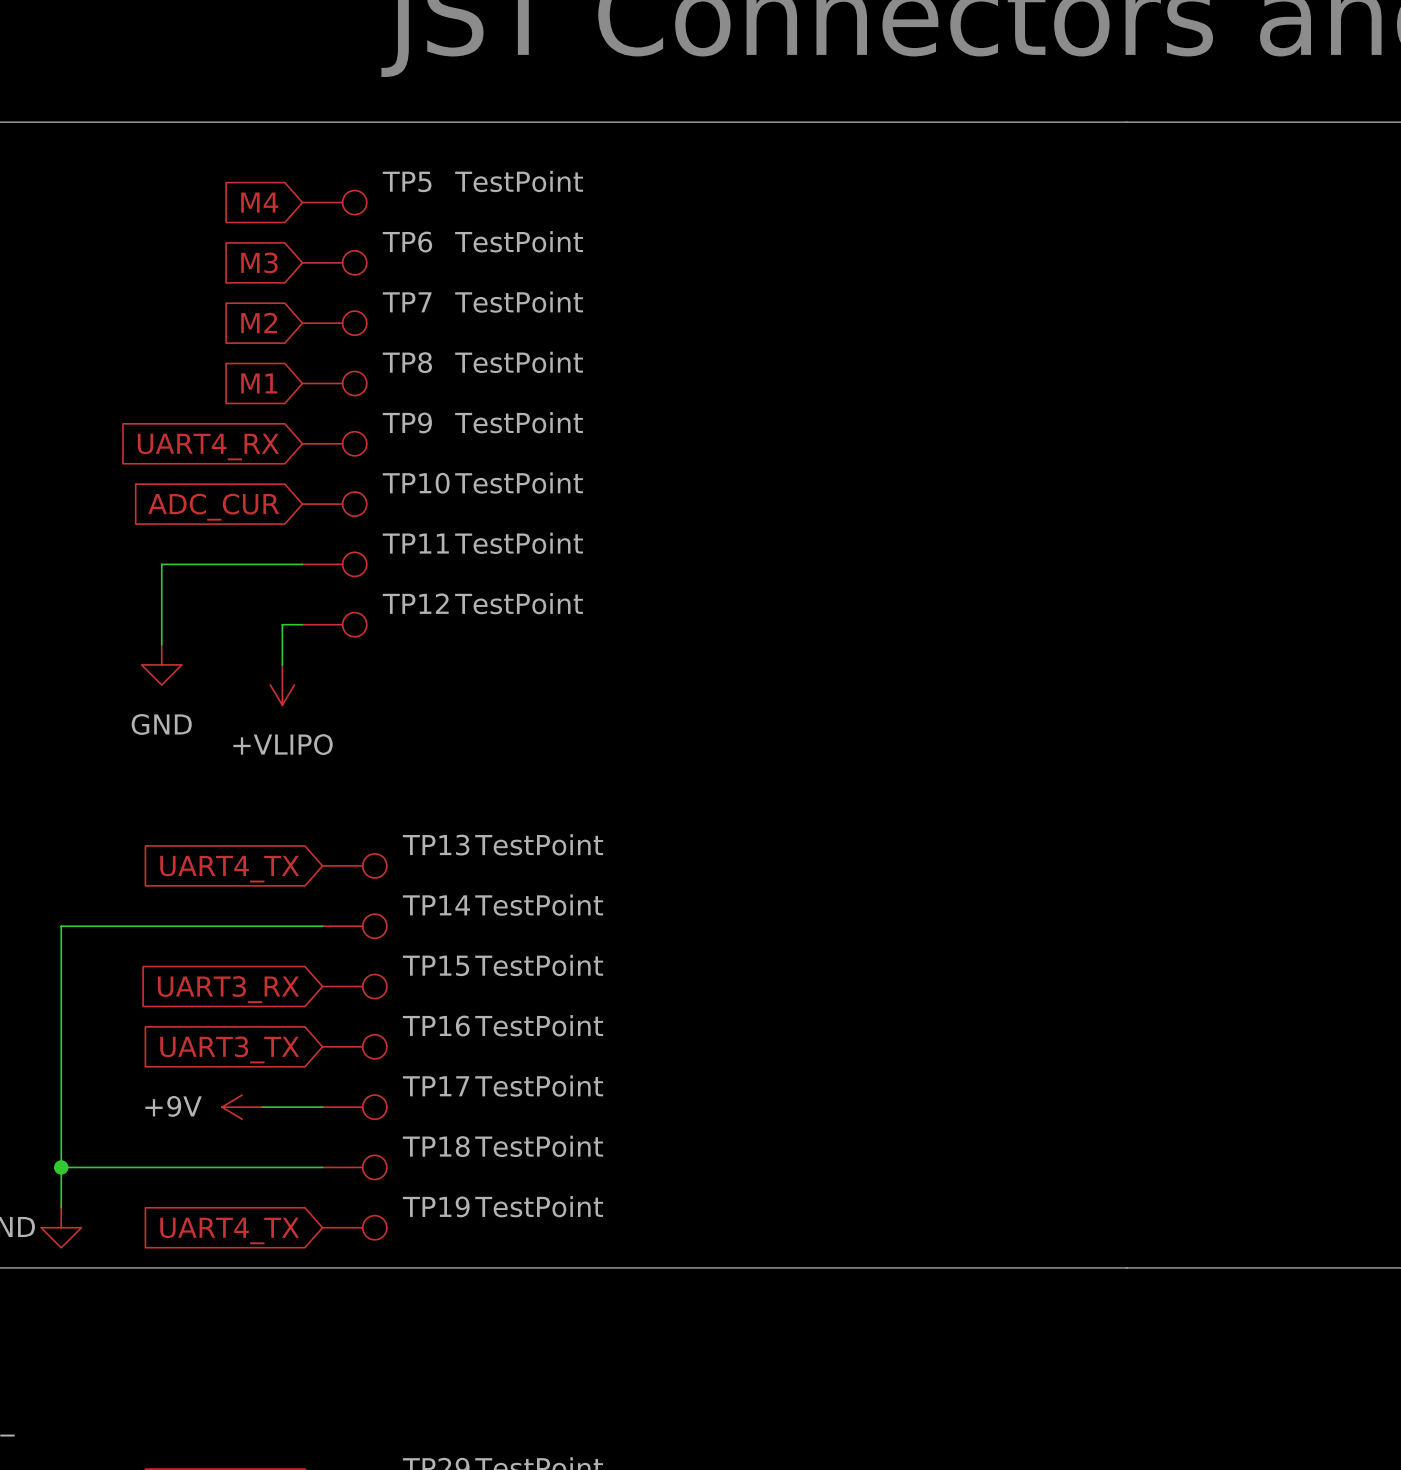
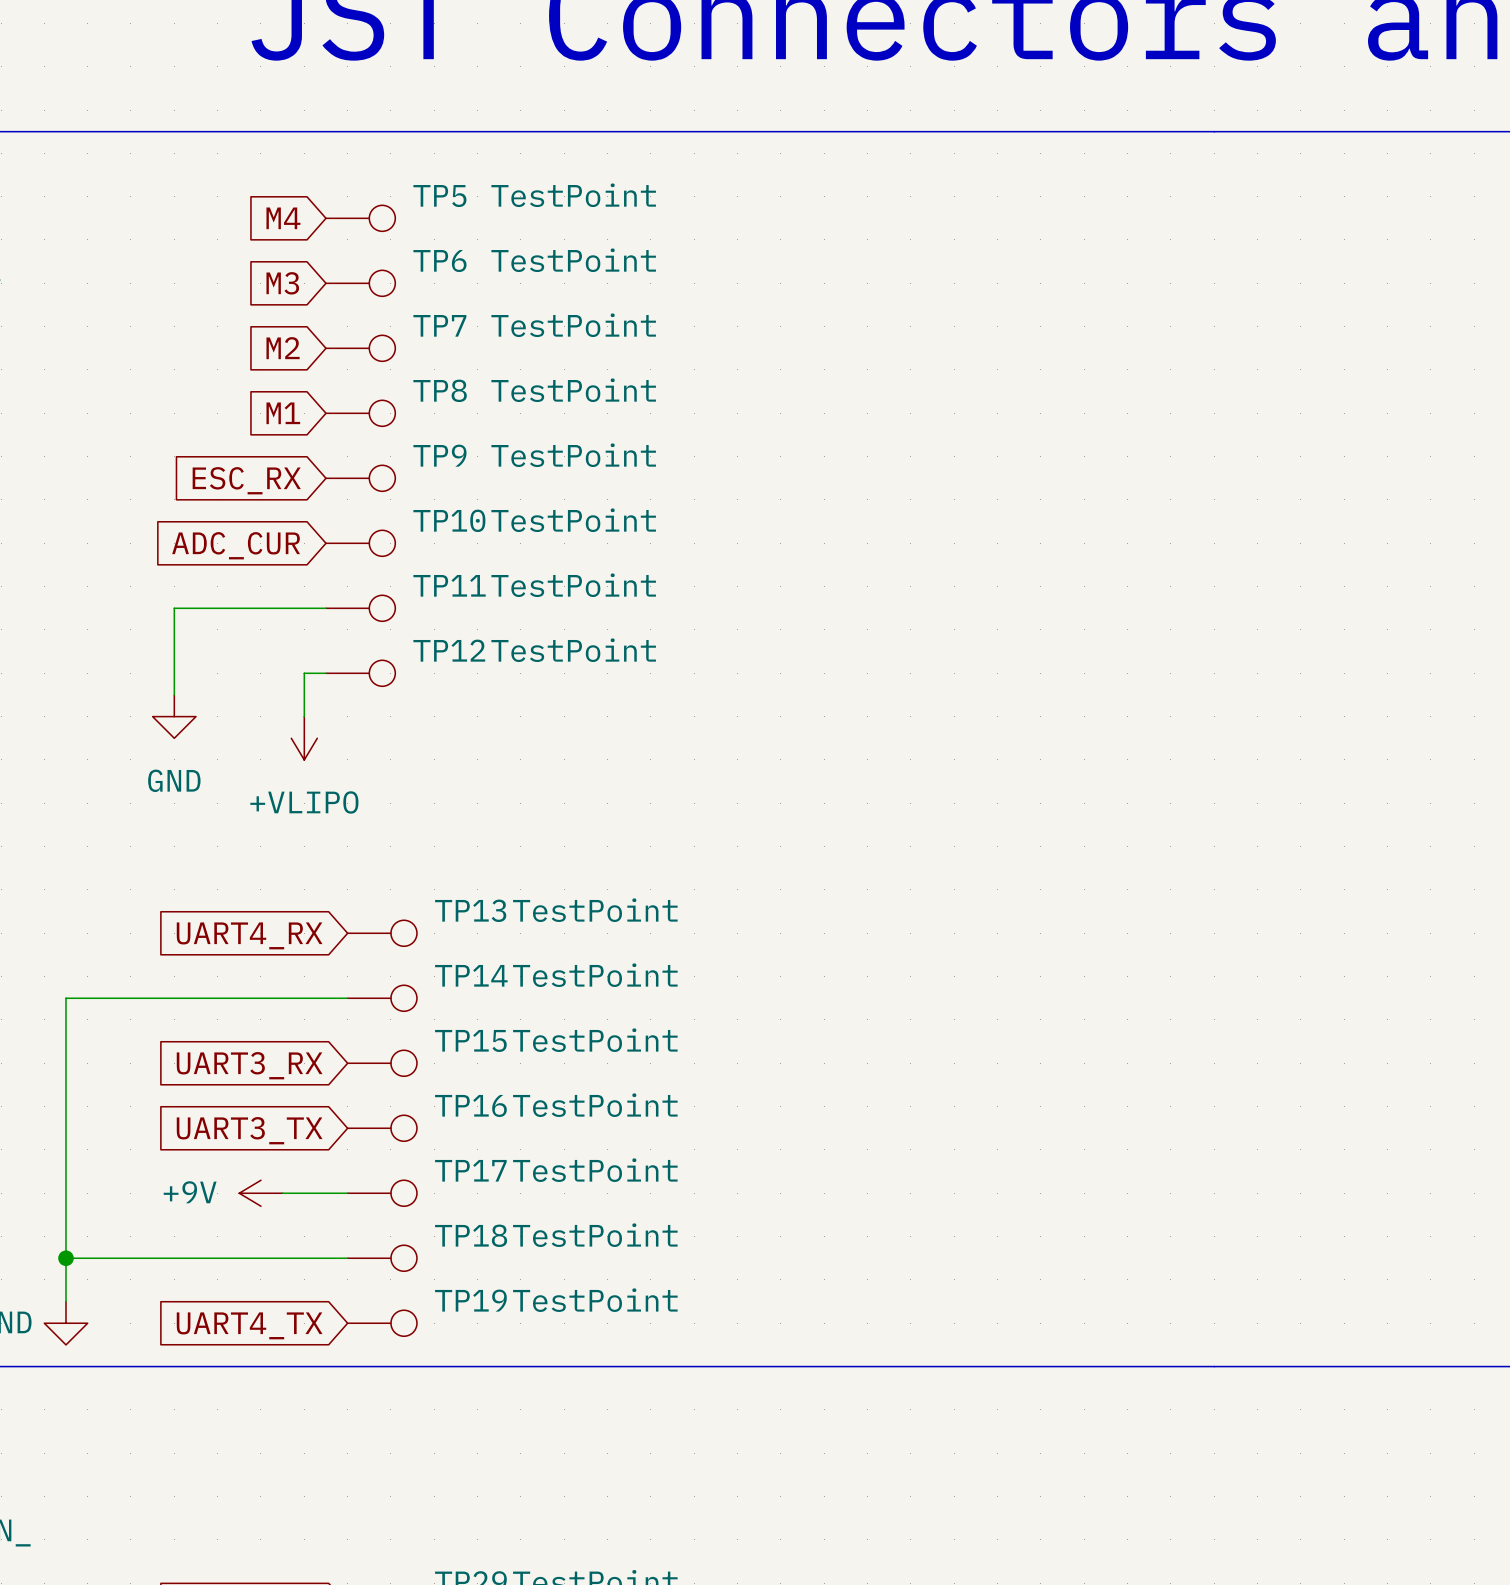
global label: UART4_RX (208, 447) -> ESC_RX (246, 480)
global label: UART4_TX (229, 869) -> UART4_RX (249, 935)

